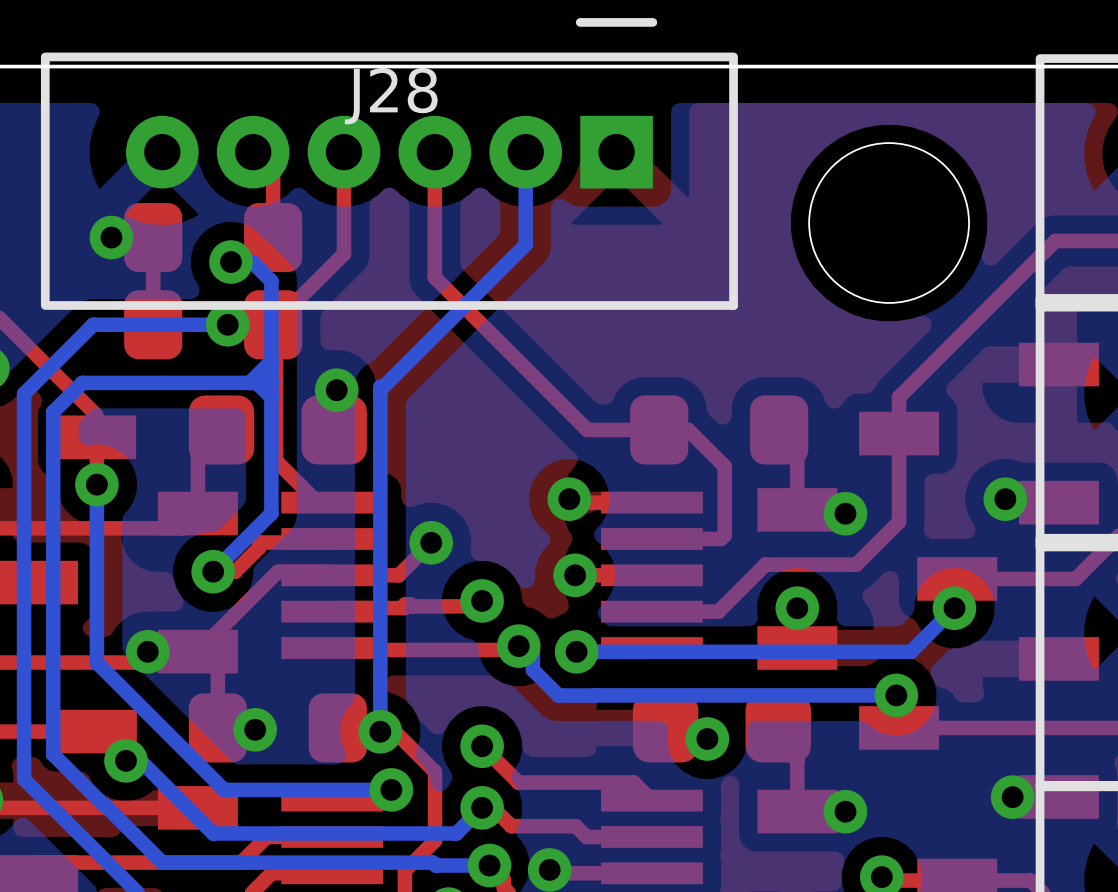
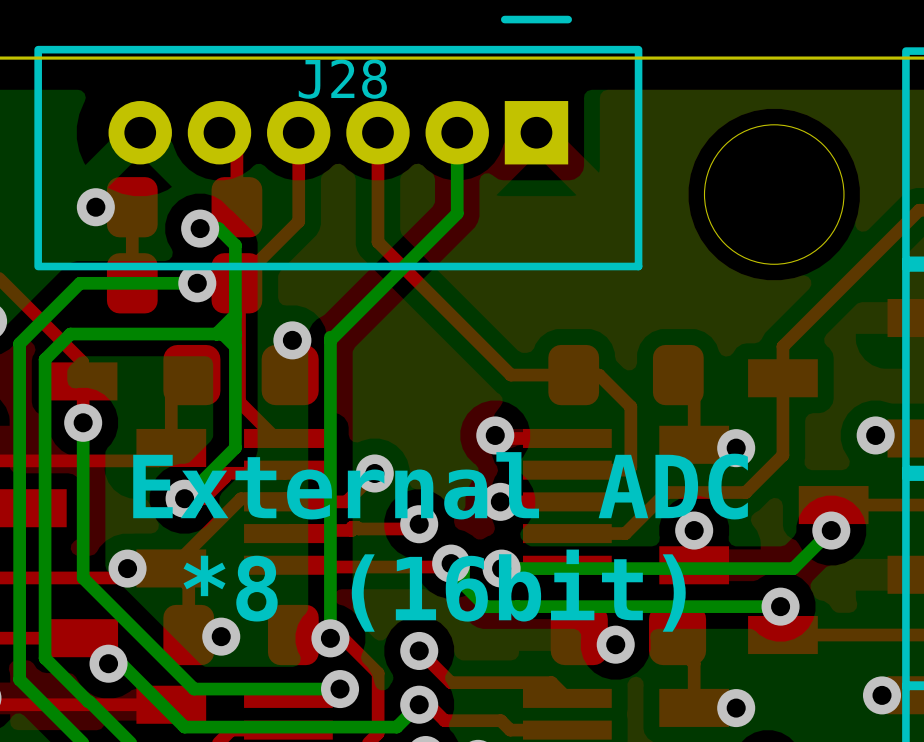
text: none -> External ADC (440, 485)
text: none -> *8 (16bit) (434, 590)

